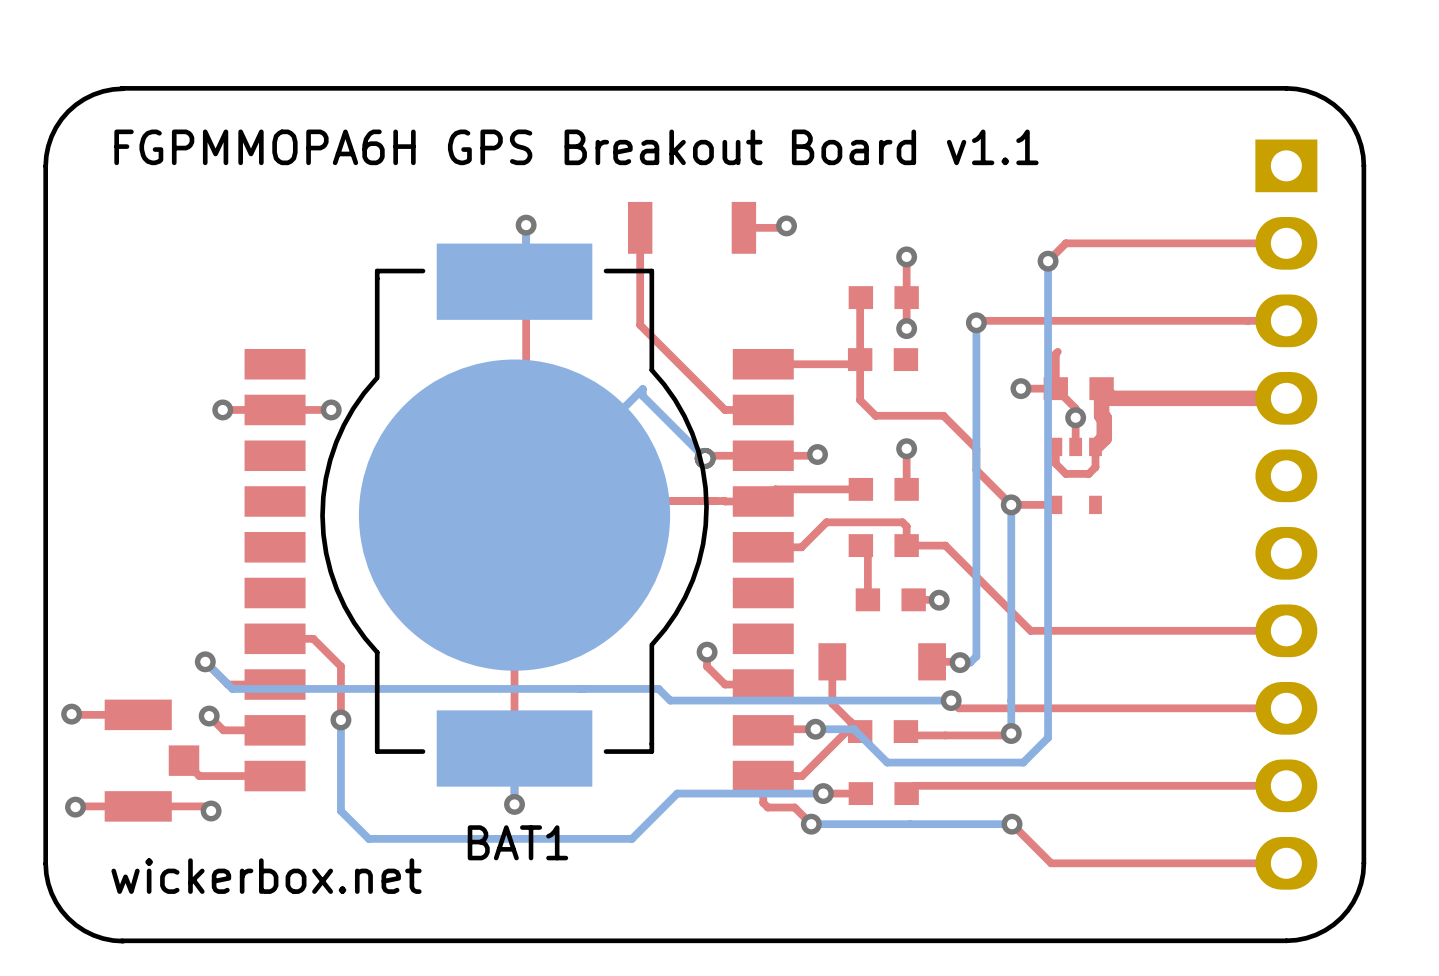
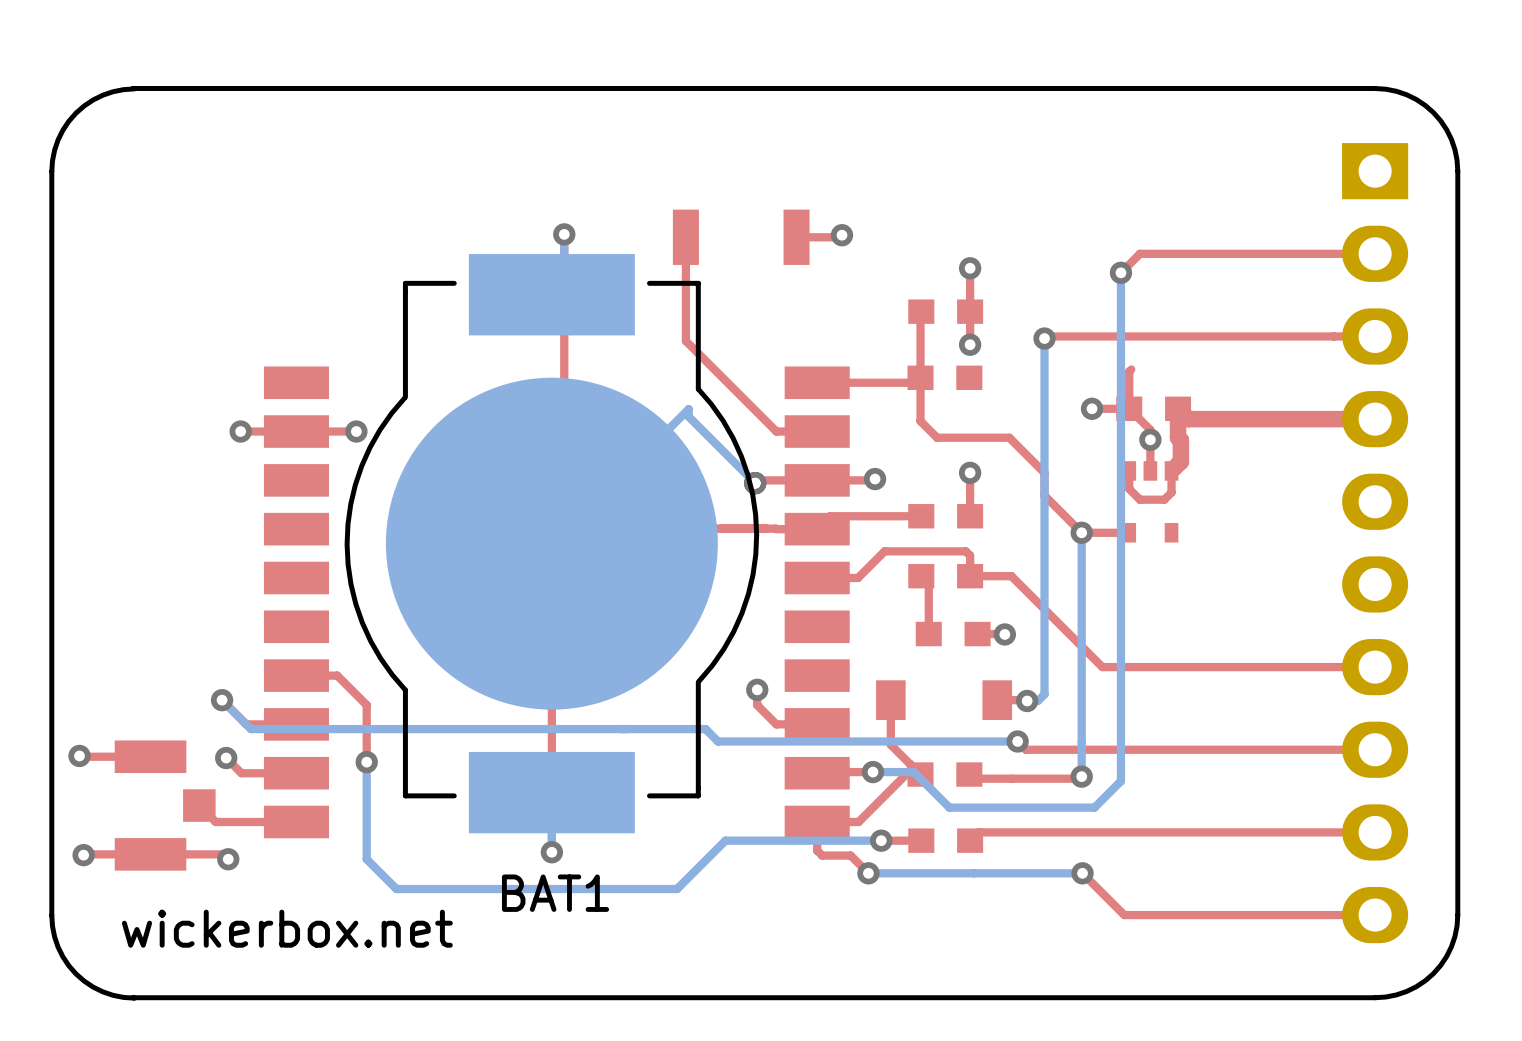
text: FGPMMOPA6H GPS Breakout Board v1.1 (576, 147) -> none

